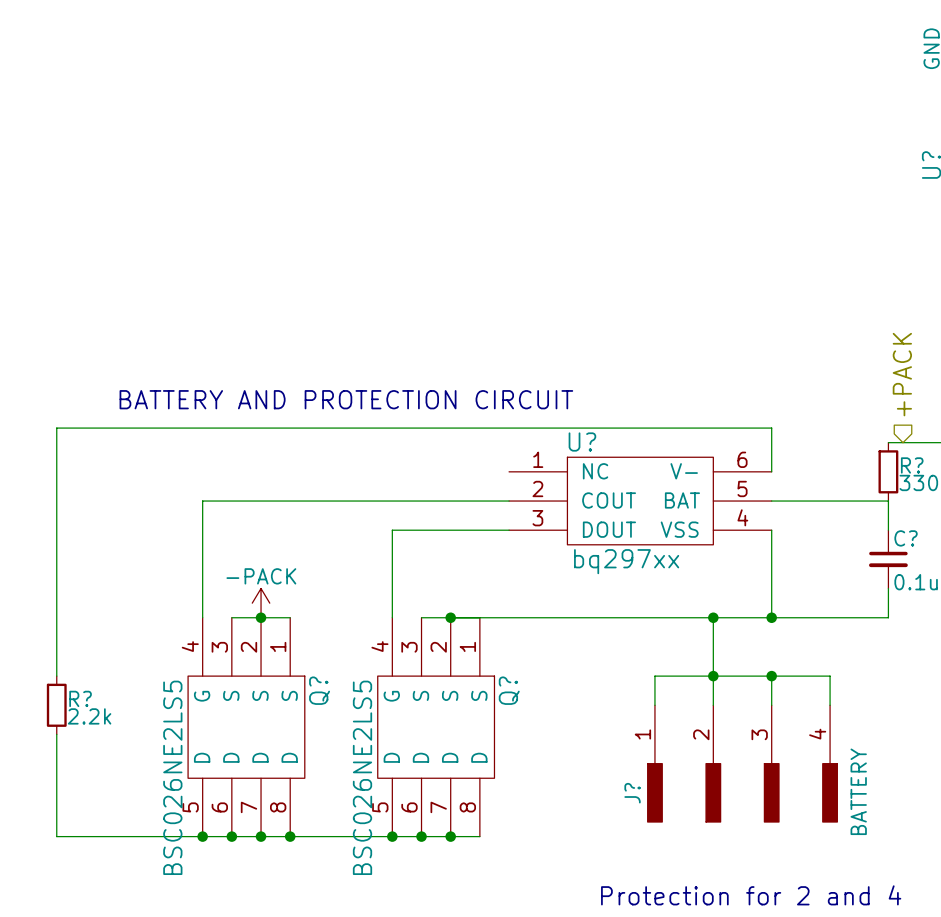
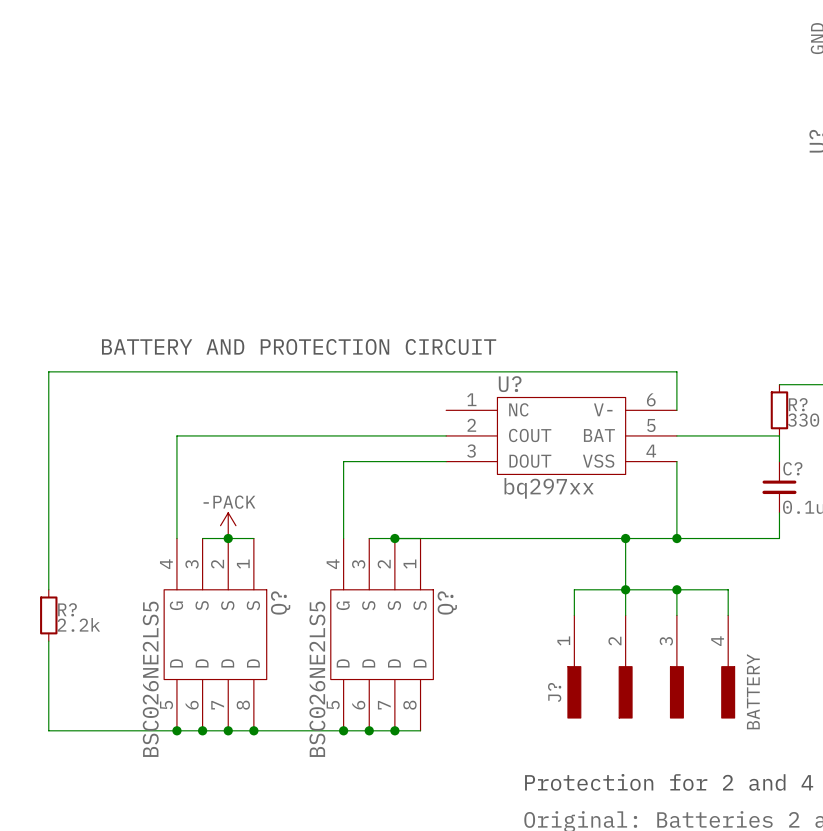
hierarchical label: +PACK (902, 374) -> none

